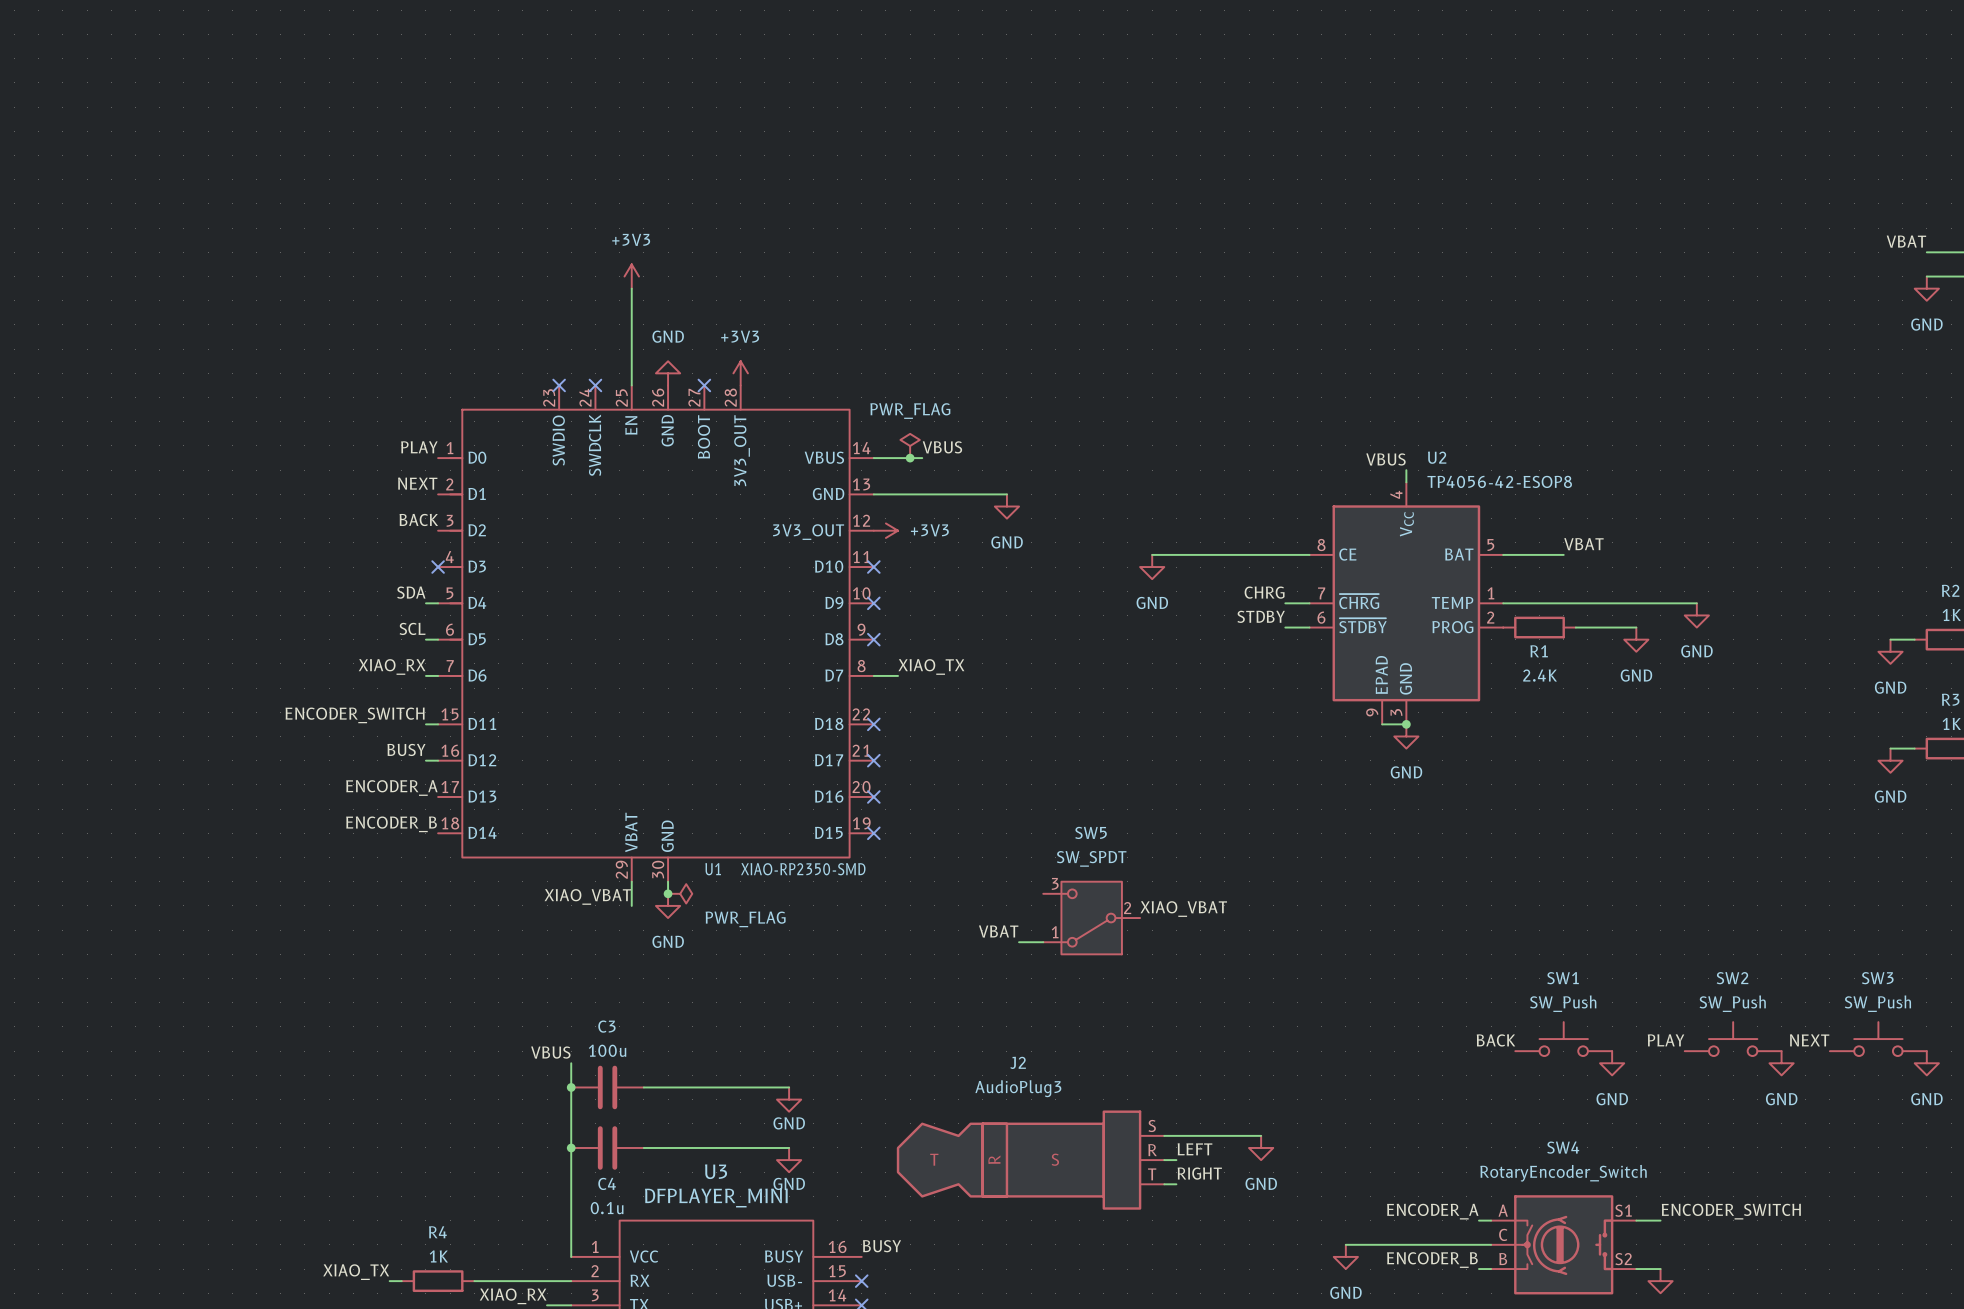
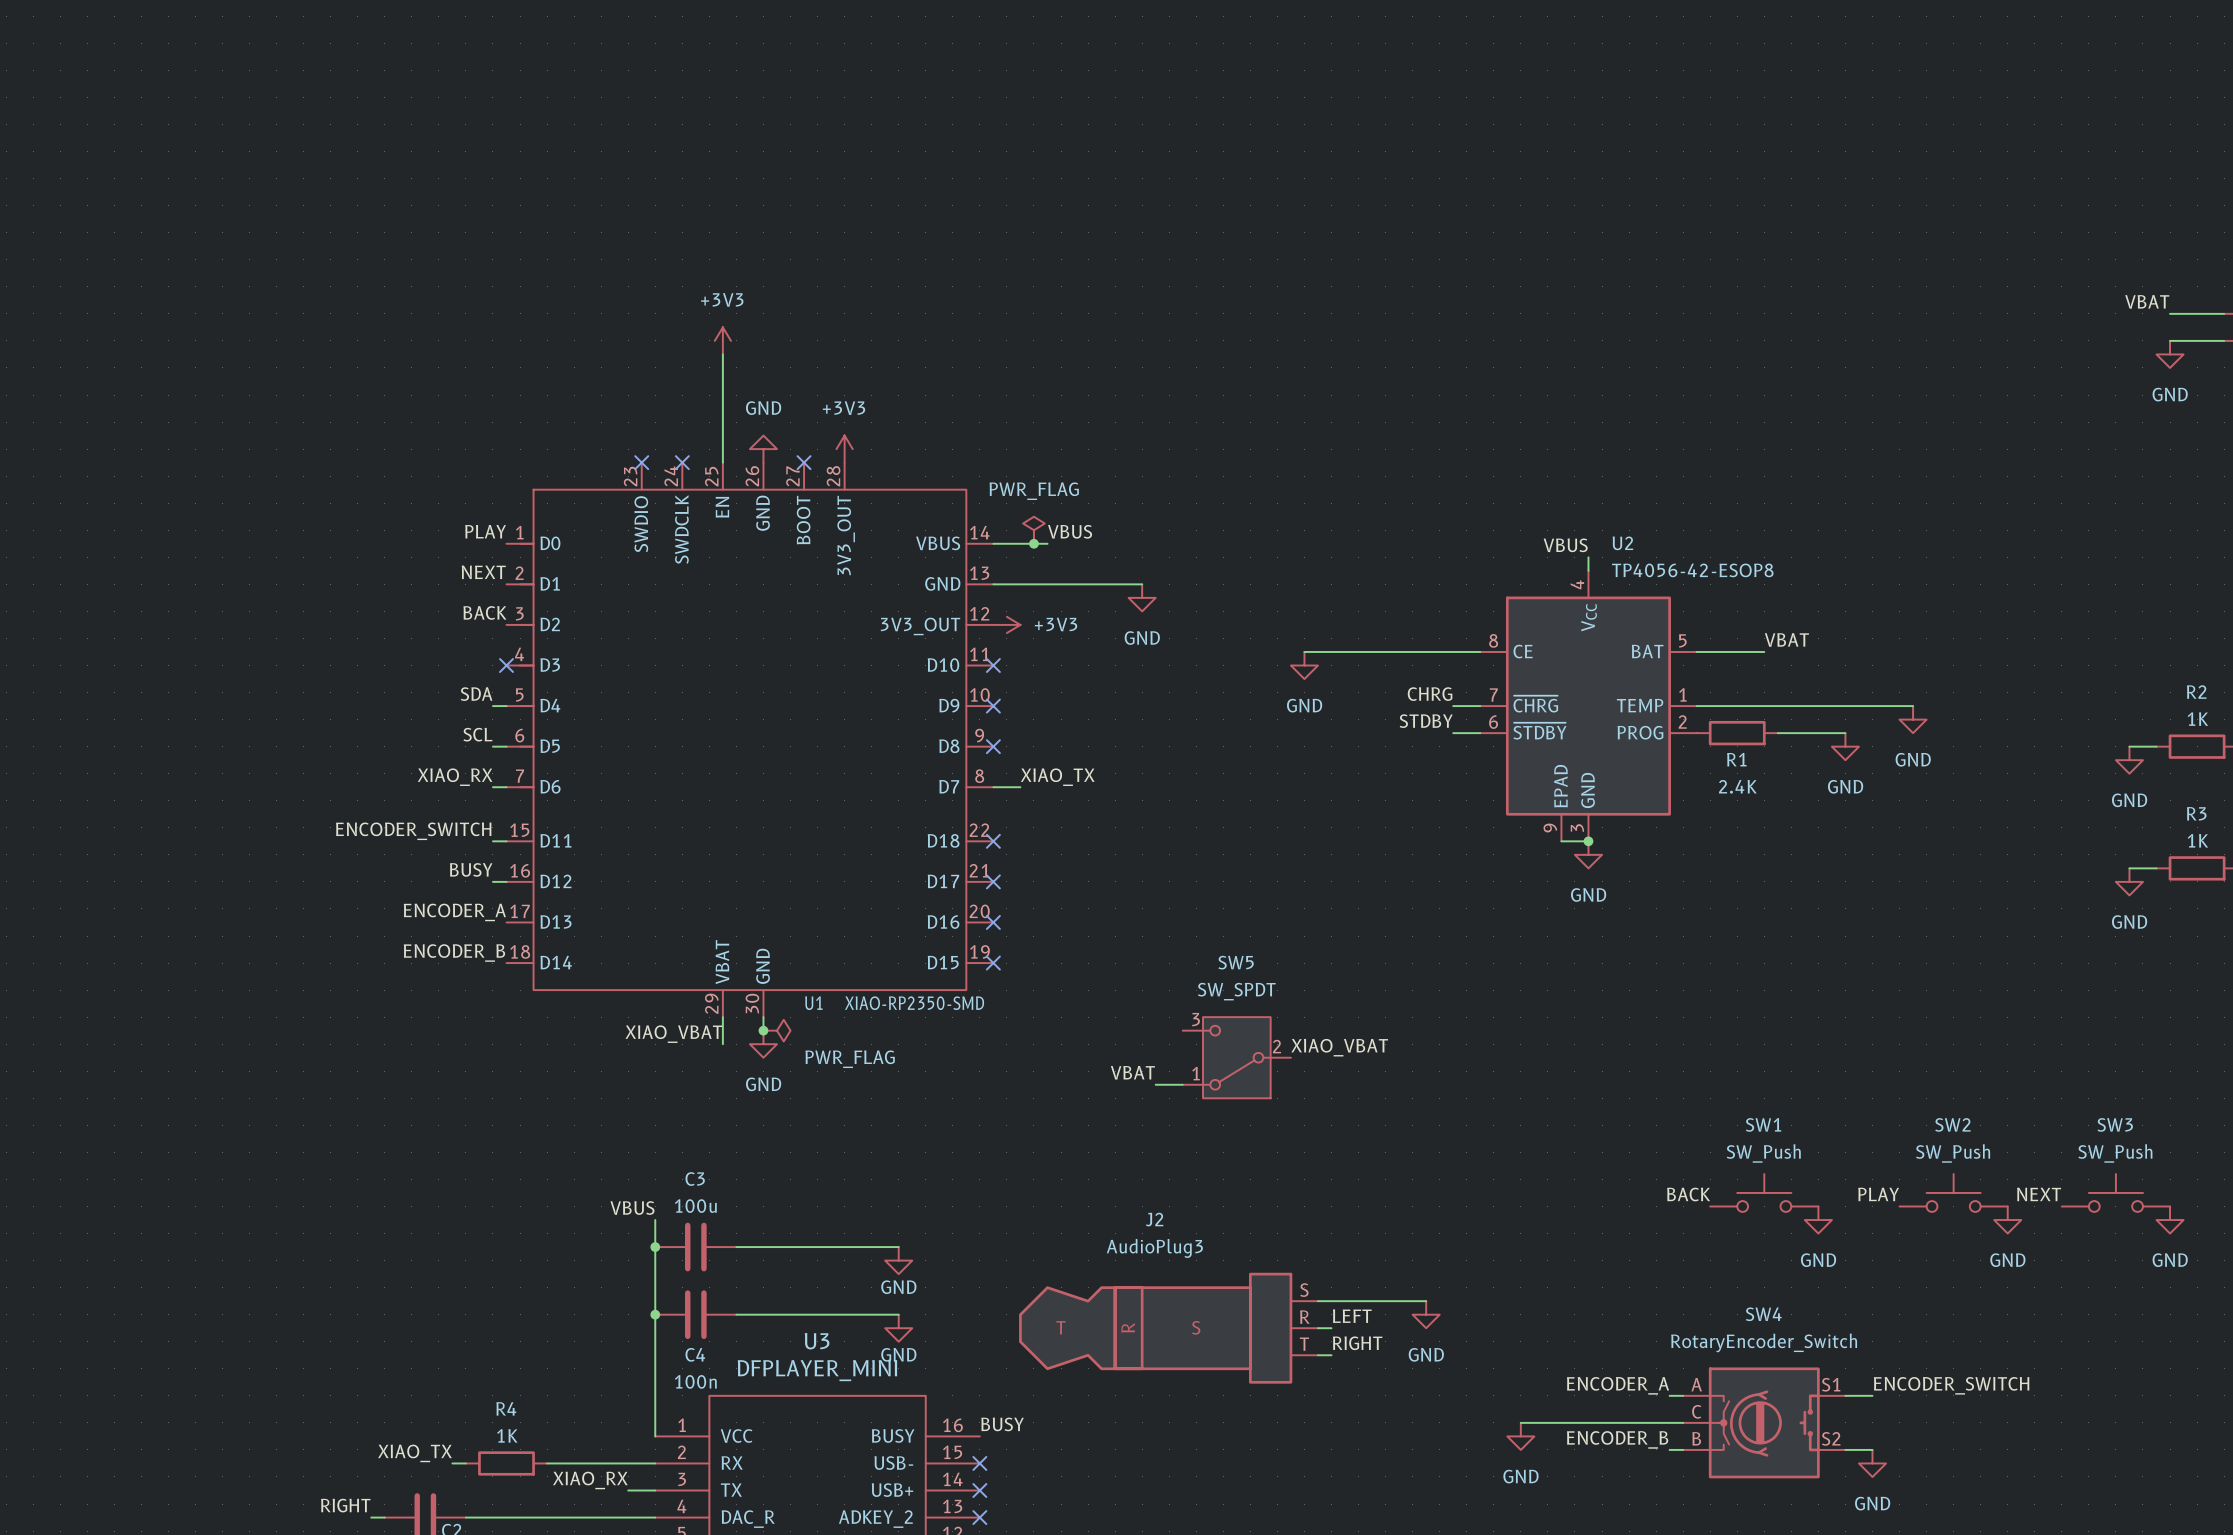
C4 value: 0.1u (607, 1208) -> 100n (695, 1381)

